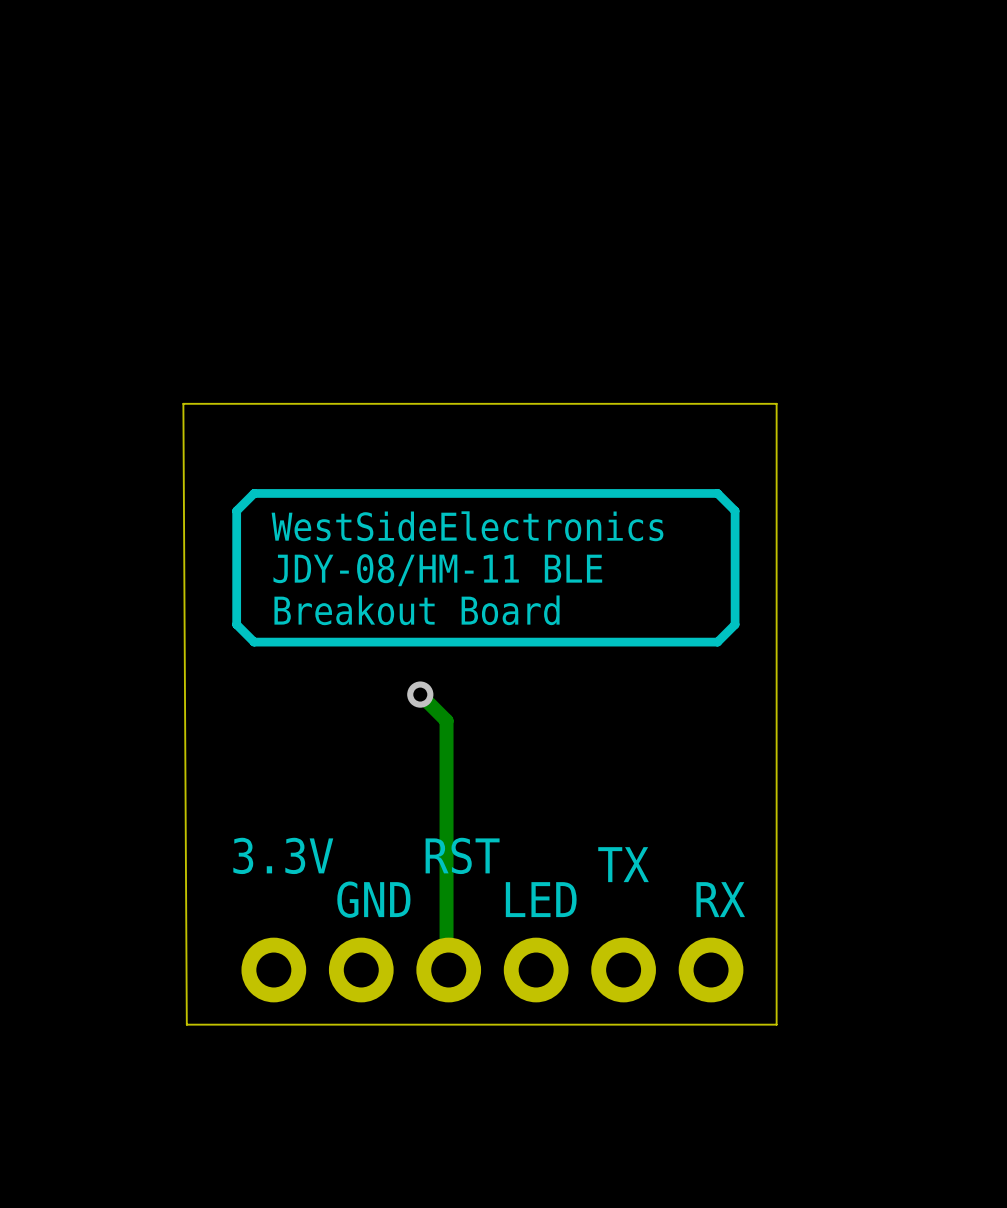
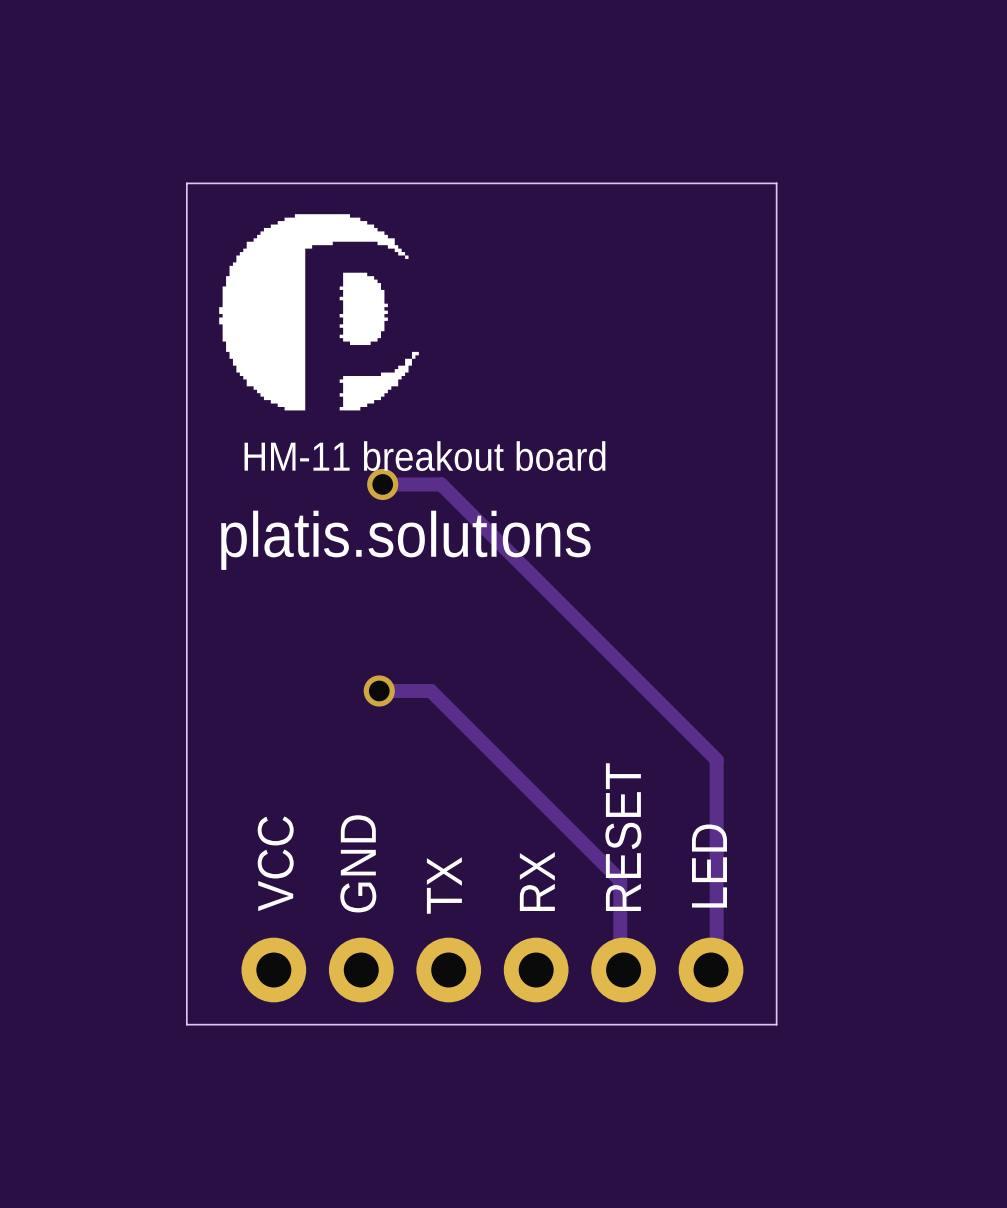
drawing: none -> [219, 214, 419, 411]
board edge: (776, 403) (183, 403) (186, 1024) -> (776, 403) (776, 183) (186, 183) (186, 1024)
text: none -> HM-11 breakout board (425, 456)
track: none -> (382, 484) (441, 484) (716, 759) (716, 964) (711, 970)
via: none -> (382, 484)
line: (717, 493) (254, 493) (236, 510) (236, 624) (254, 642) (717, 642) (735, 624) (735, 510) (717, 493) -> none
text: WestSideElectronics (467, 526) -> none
text: none -> platis.solutions (405, 540)
text: JDY-08/HM-11 BLE (437, 570) -> none
text: Breakout Board (417, 610) -> none
track: none -> (379, 690) (430, 690) (620, 880) (620, 966) (623, 970)
via: none -> (379, 690)
track: (420, 694) (446, 720) (446, 967) (448, 970) -> none
via: (420, 694) -> none
text: none -> RESET (623, 837)
text: 3.3V (283, 855) -> none
text: RST (462, 855) -> none
text rotation: 0° (623, 864) -> 90° counterclockwise (444, 885)
text position: TX (623, 864) -> TX (444, 885)
text: none -> VCC (275, 863)
text rotation: 0° (373, 899) -> 90° counterclockwise (358, 863)
text rotation: 0° (541, 899) -> 90° counterclockwise (709, 866)
text position: LED (541, 899) -> LED (709, 866)
text rotation: 0° (720, 899) -> 90° counterclockwise (537, 881)
text position: RX (720, 899) -> RX (537, 881)

